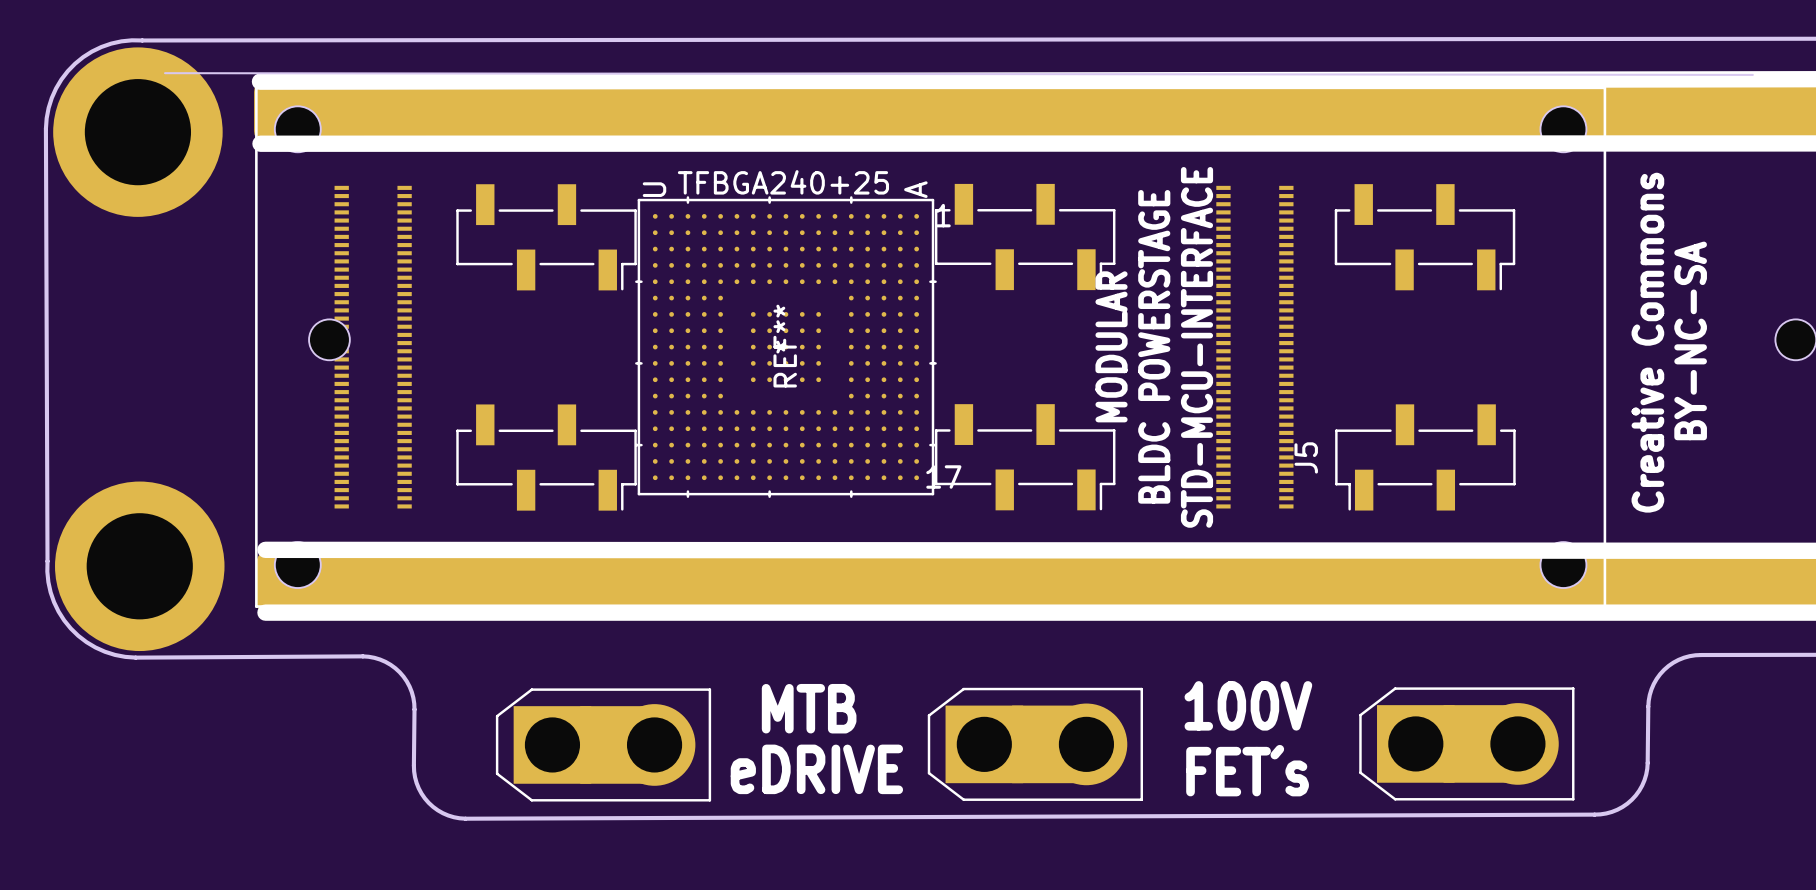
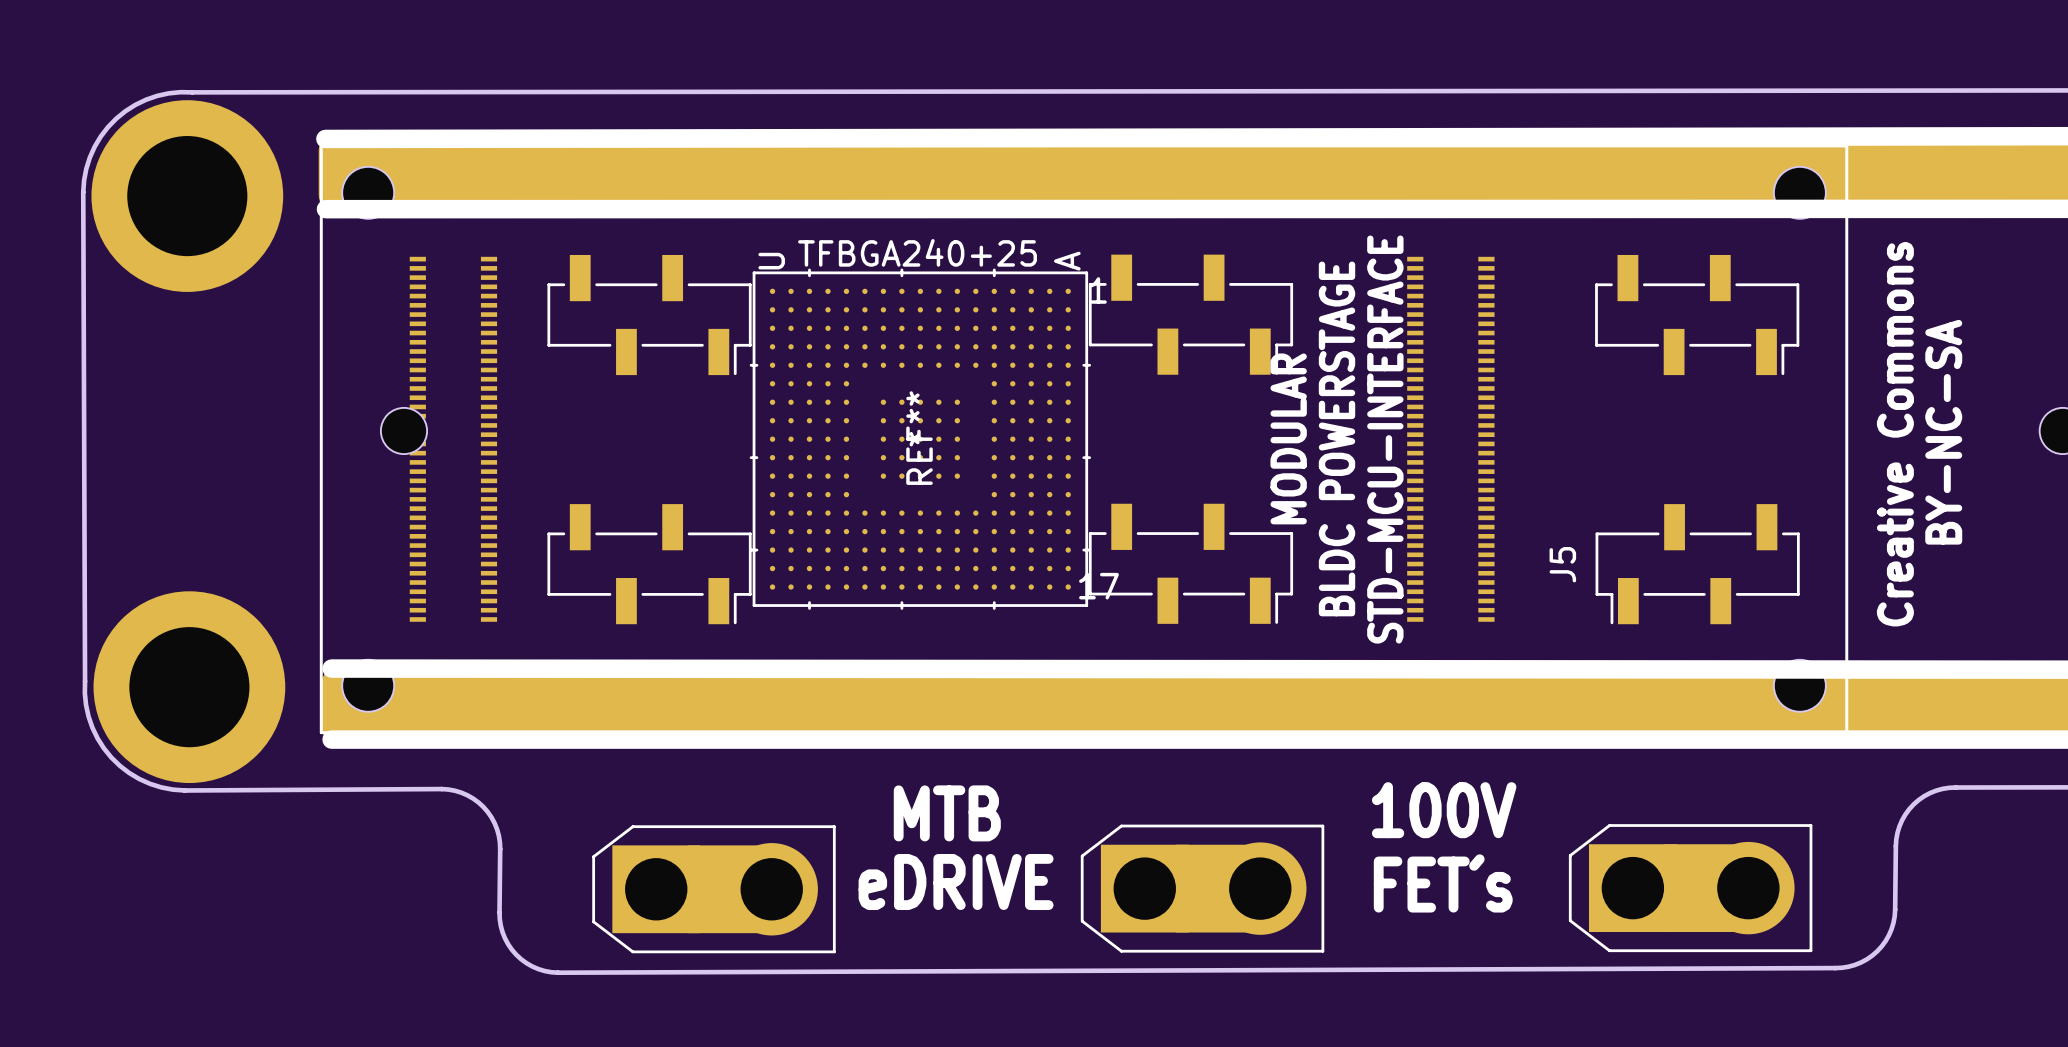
board edge: (165, 73) (1752, 74) -> none
part position: (1425, 237) -> (1697, 315)
J5 position: (1425, 457) -> (1697, 564)
text position: 100V (1248, 705) -> 100V (1444, 810)
text position: MTB (809, 708) -> MTB (947, 813)
text position: eDRIVE (816, 769) -> eDRIVE (956, 882)
text position: FET´s (1247, 770) -> FET´s (1443, 883)

